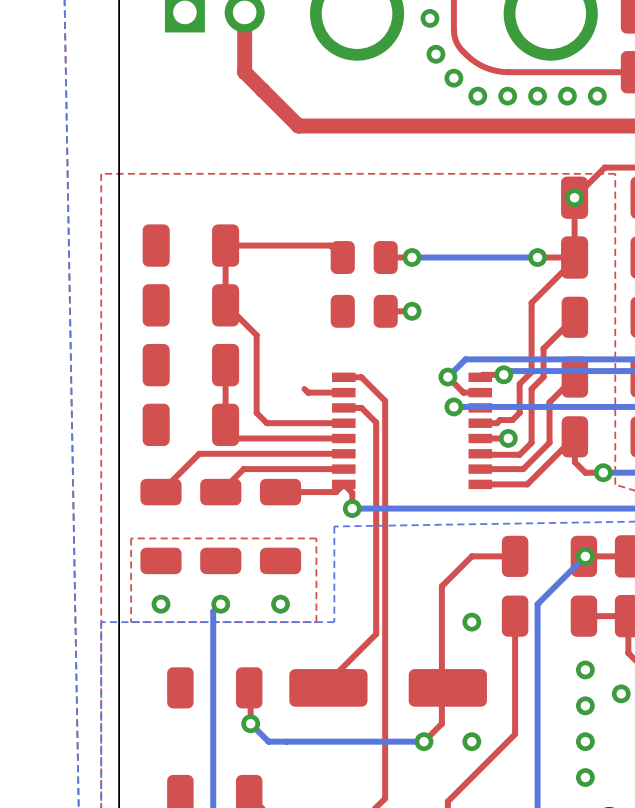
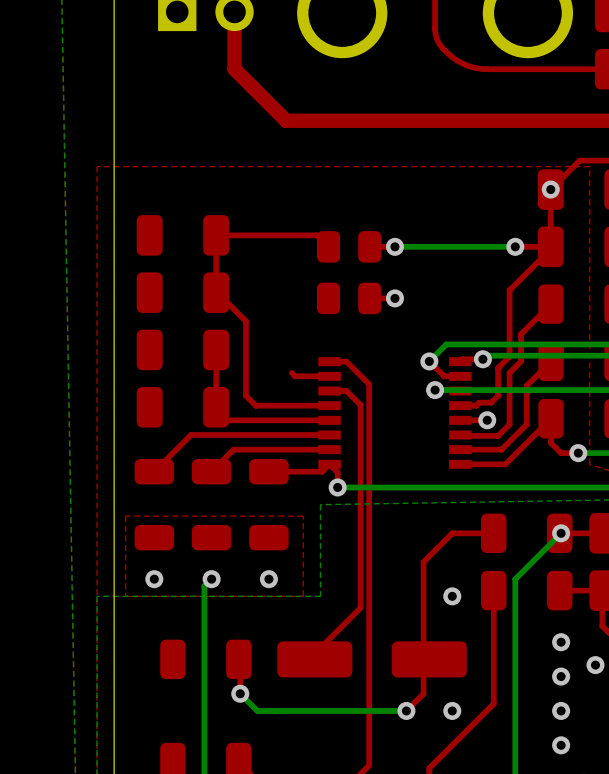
via: (429, 18) -> none
via: (435, 54) -> none
via: (453, 78) -> none
via: (477, 96) -> none
via: (507, 96) -> none
via: (537, 96) -> none
via: (567, 96) -> none
via: (597, 96) -> none

